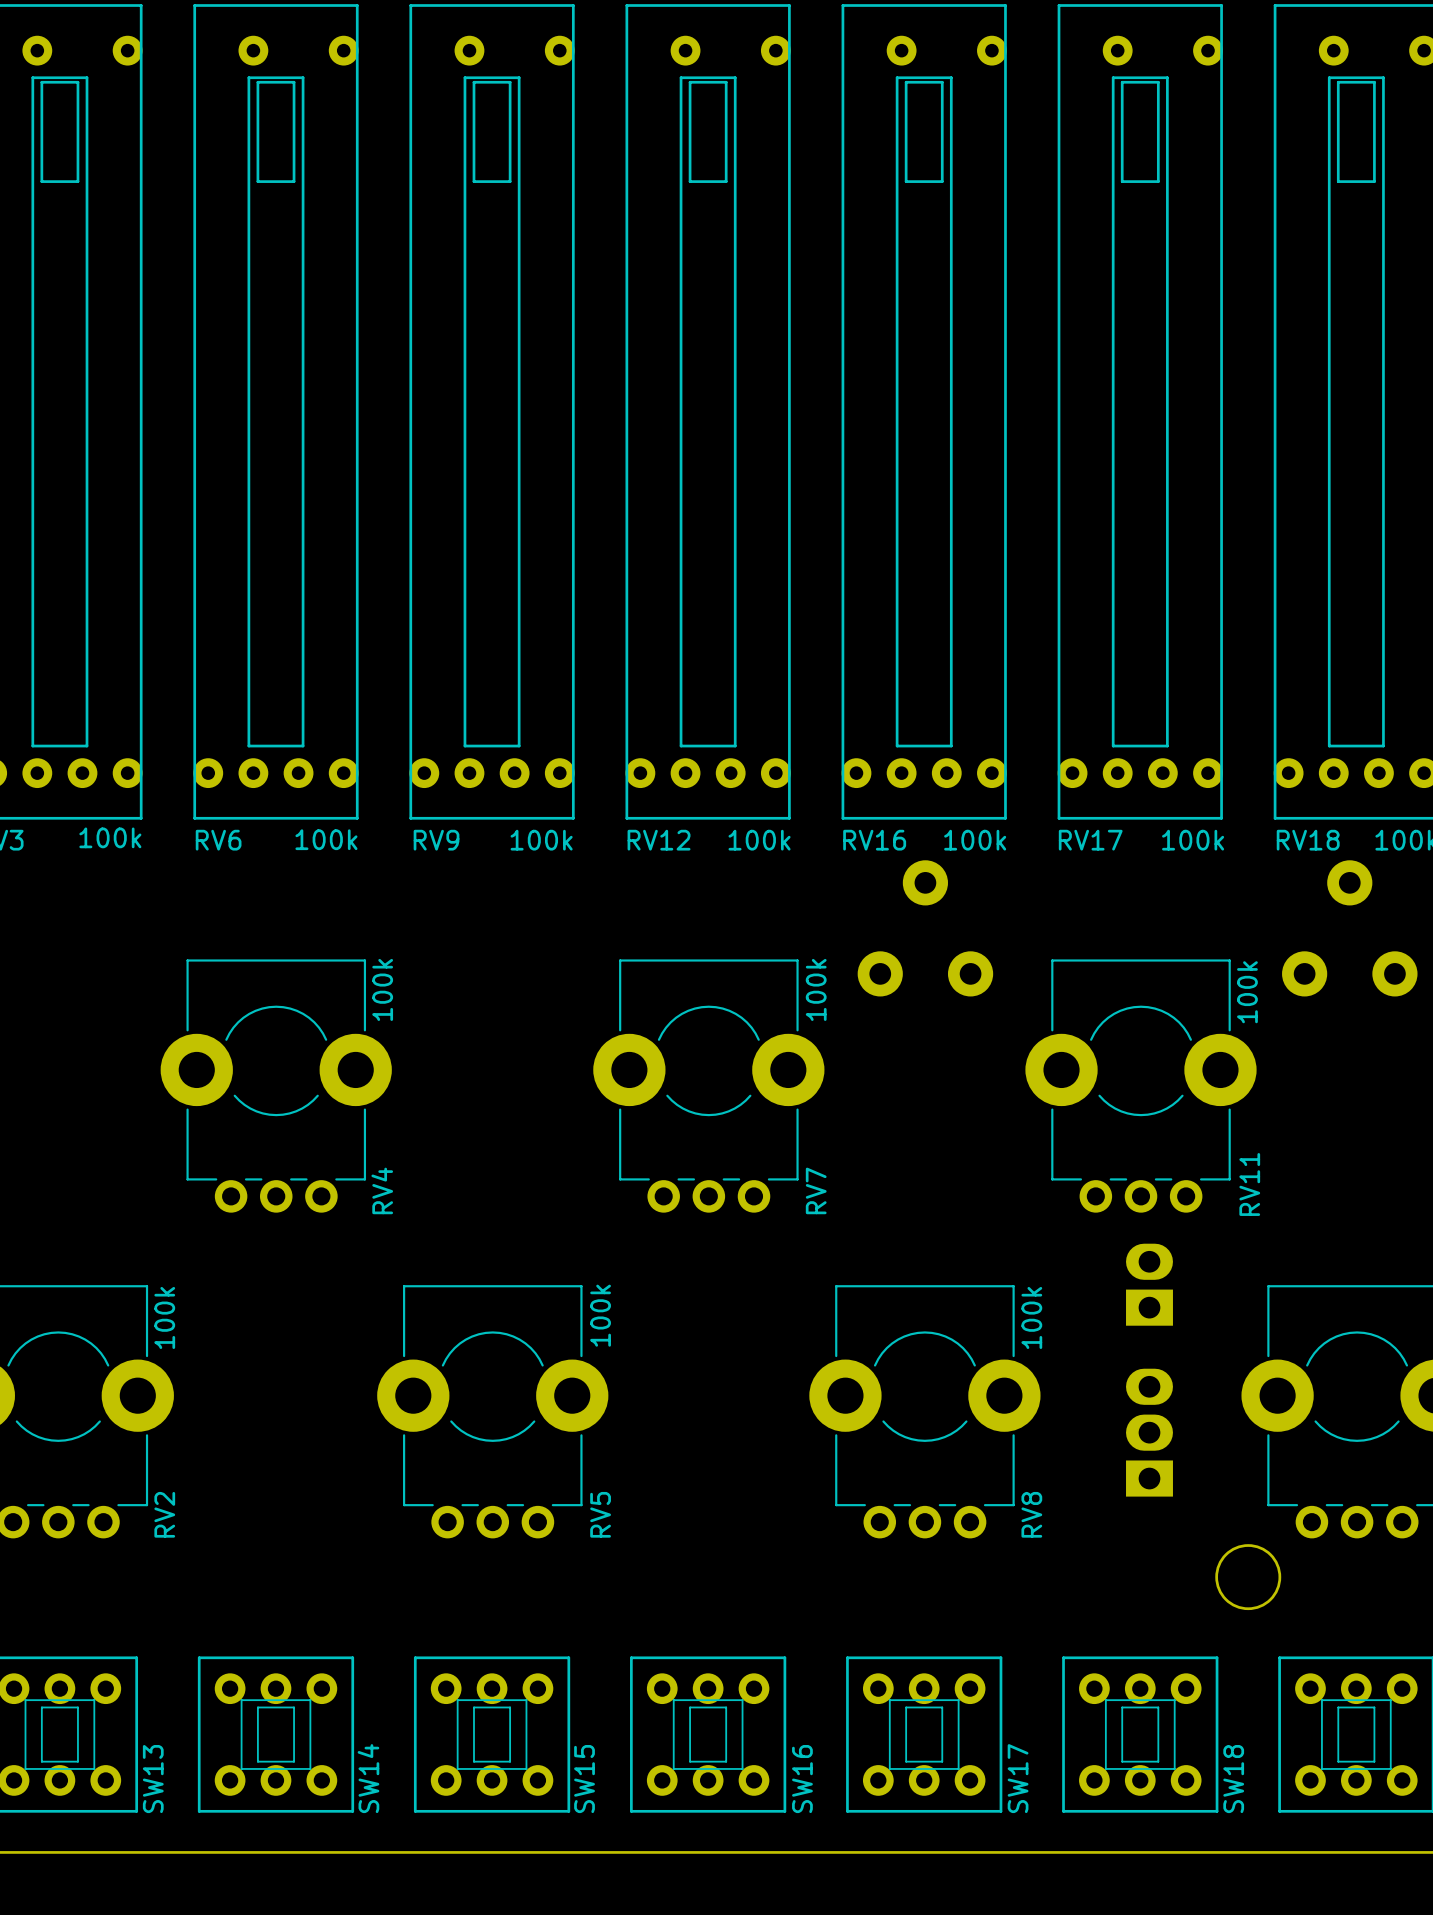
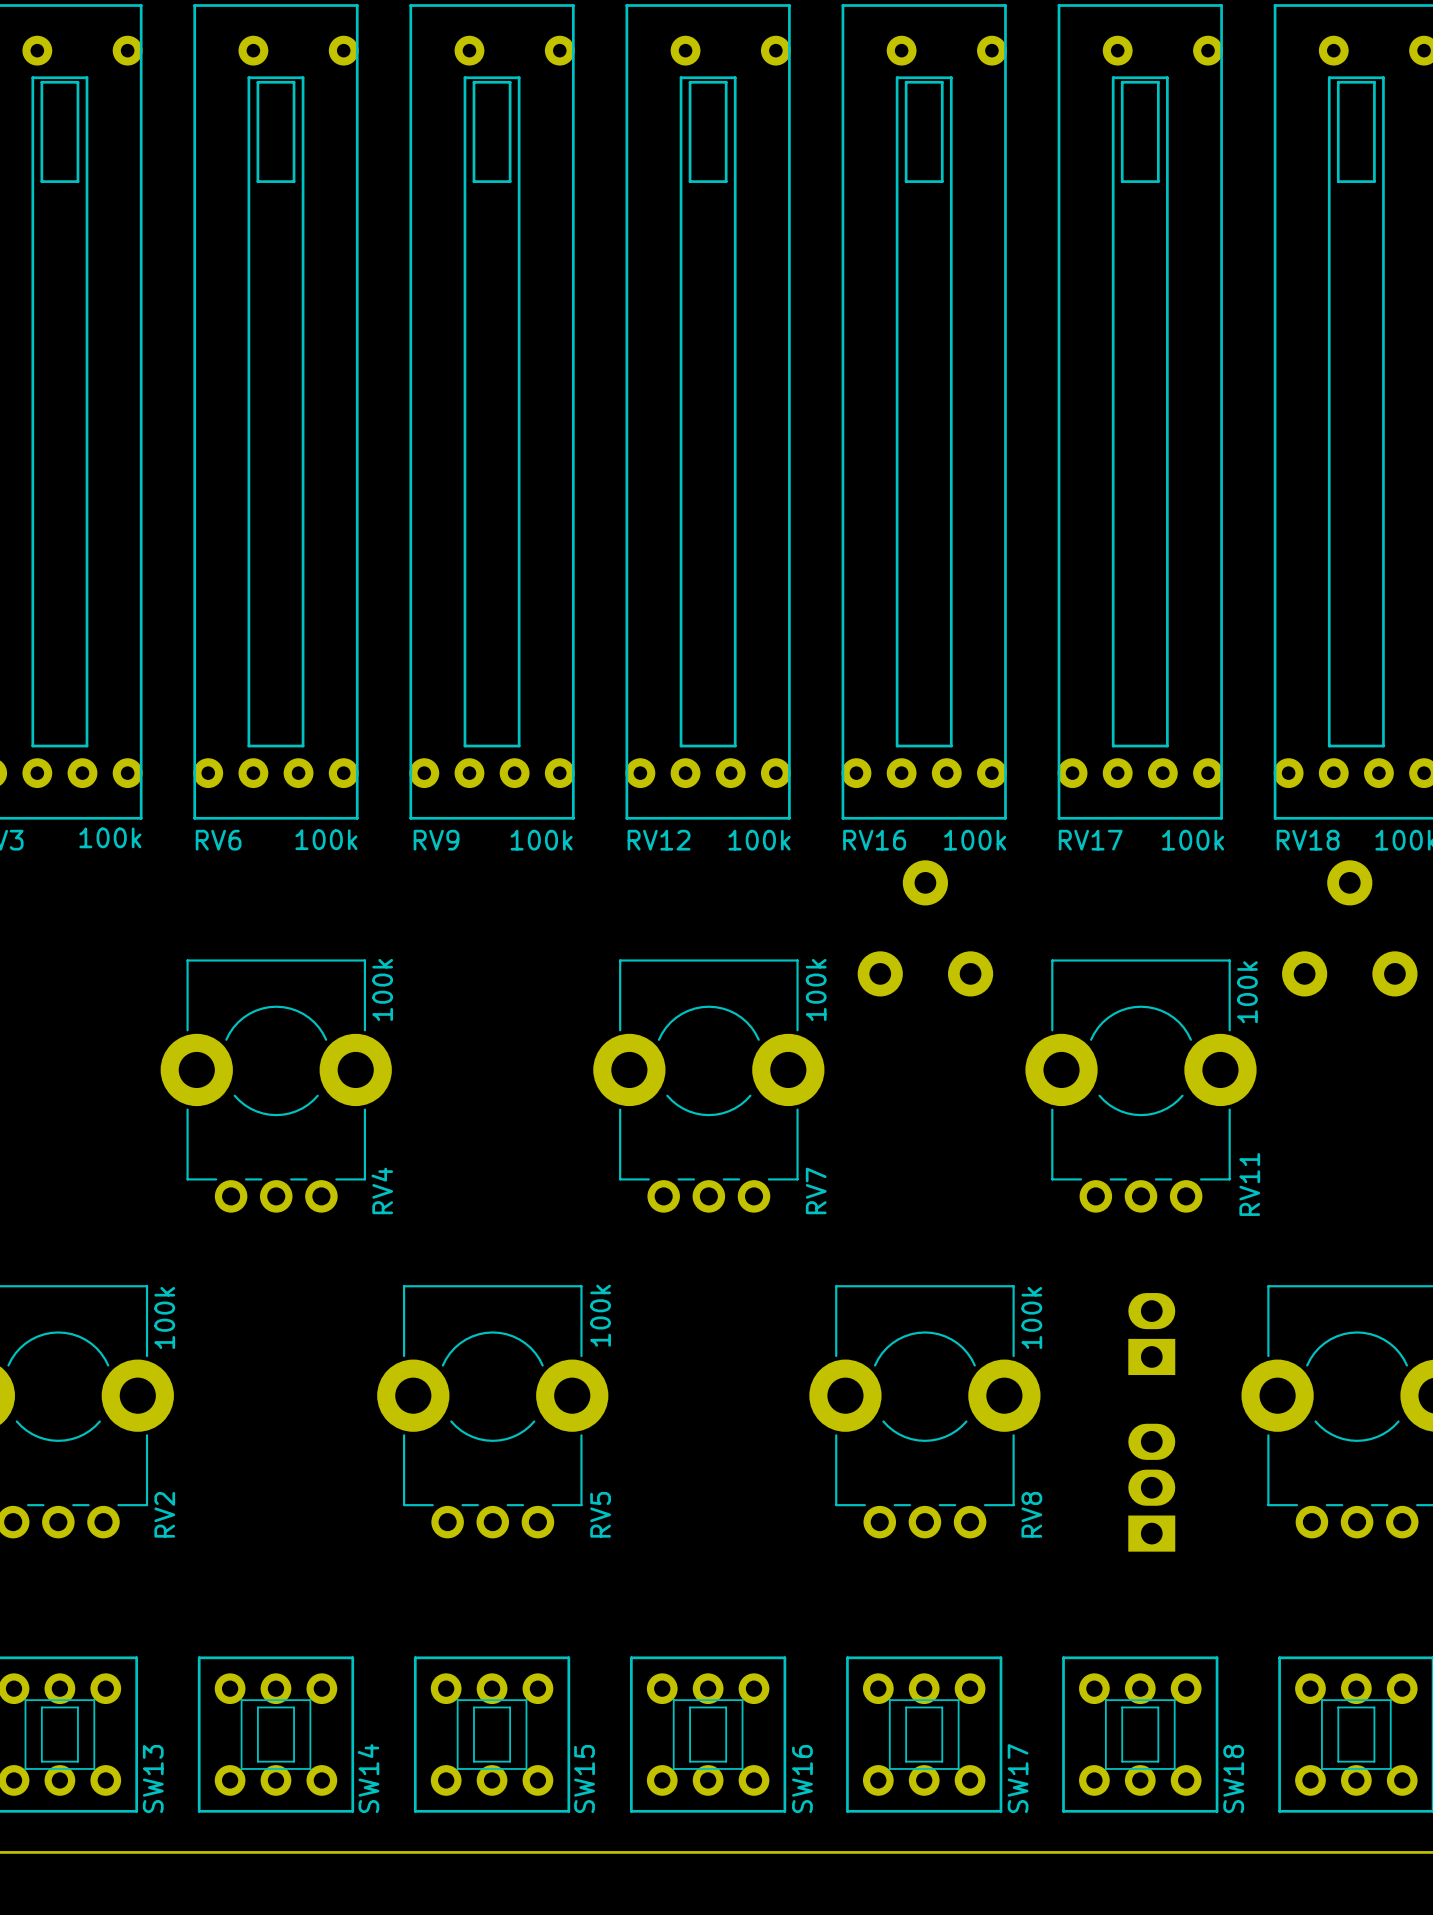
part position: (1149, 1284) -> (1151, 1334)
part position: (1149, 1432) -> (1151, 1487)
round board edge: [1215, 1544, 1282, 1611] -> none

